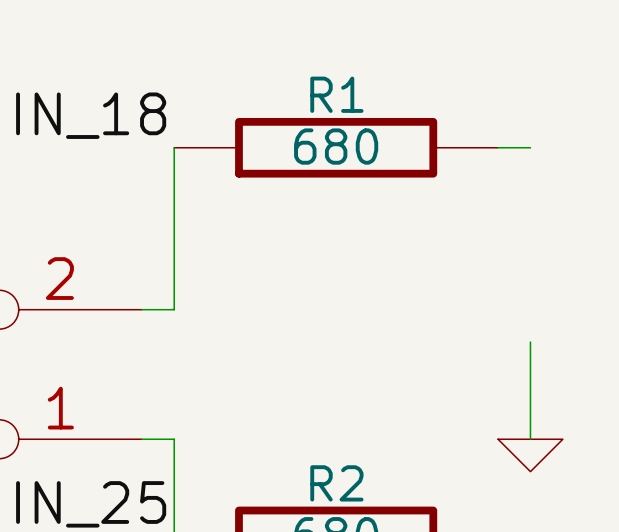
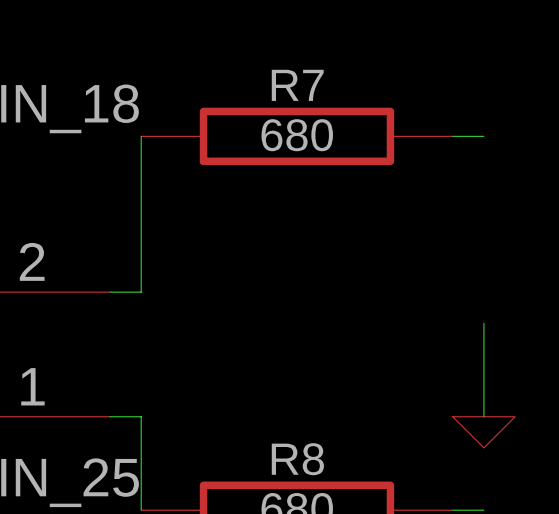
R1 name: R1 (336, 94) -> R7 (297, 85)
R2 name: R2 (336, 483) -> R8 (297, 459)

